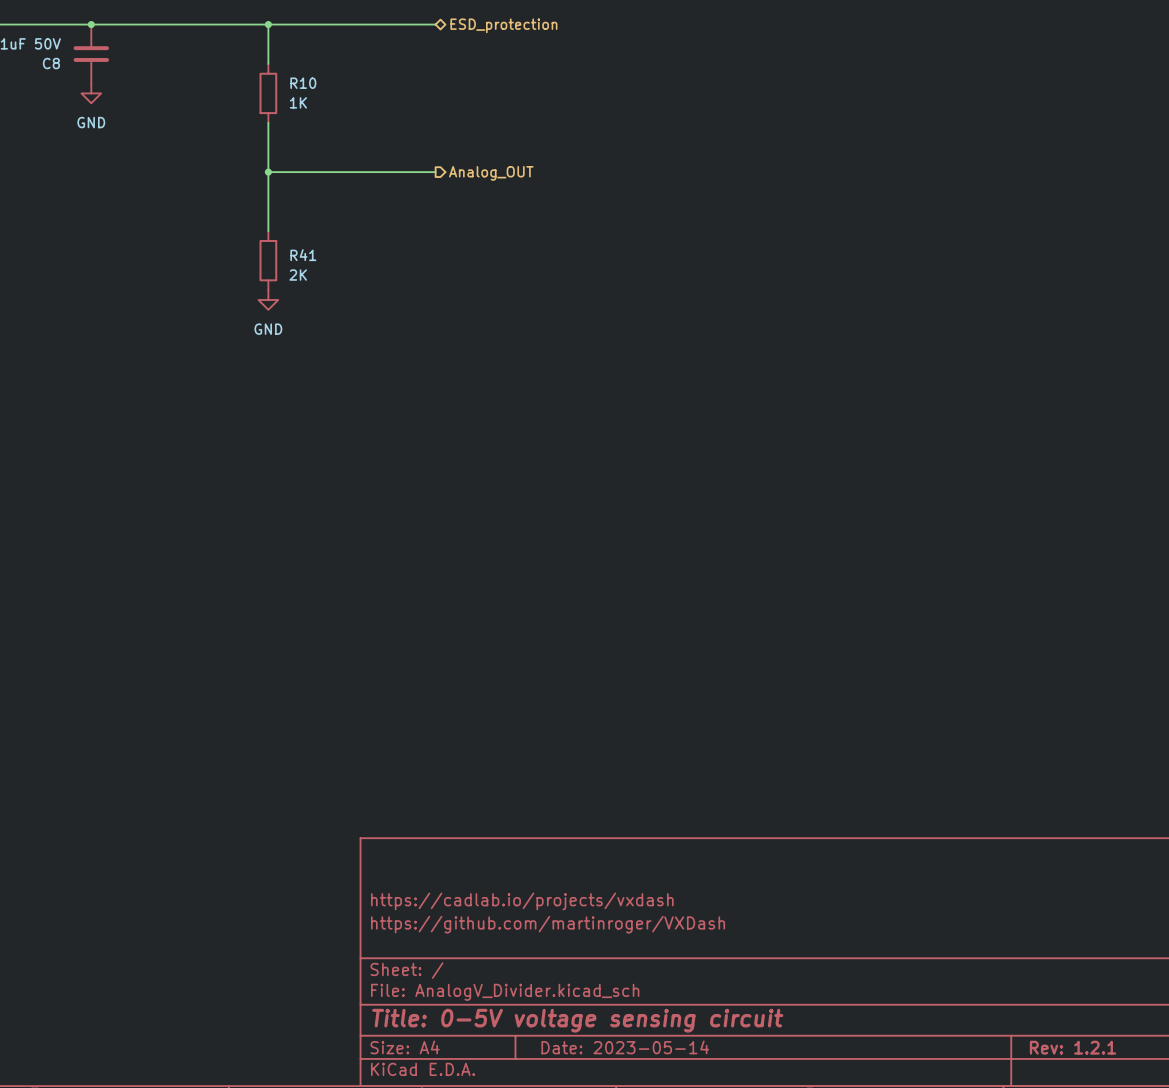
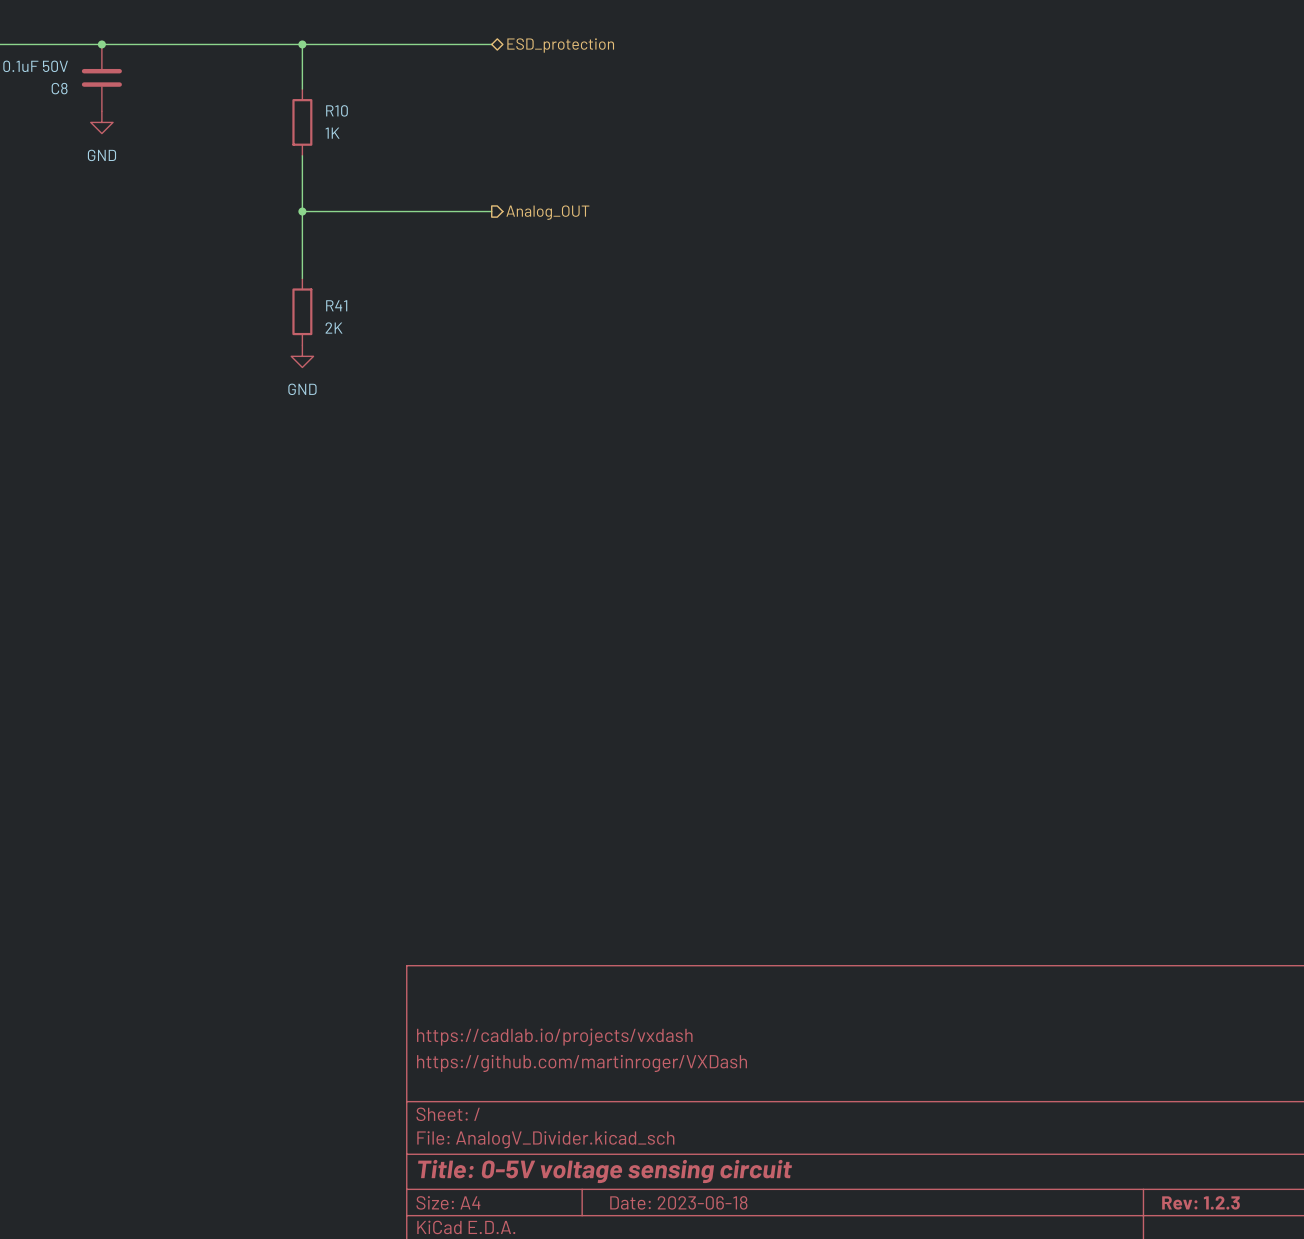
title block: Date: 2023-05-14 (625, 1047) -> Date: 2023-06-18 (678, 1202)
title block: Rev: 1.2.1 (1073, 1047) -> Rev: 1.2.3 (1201, 1202)

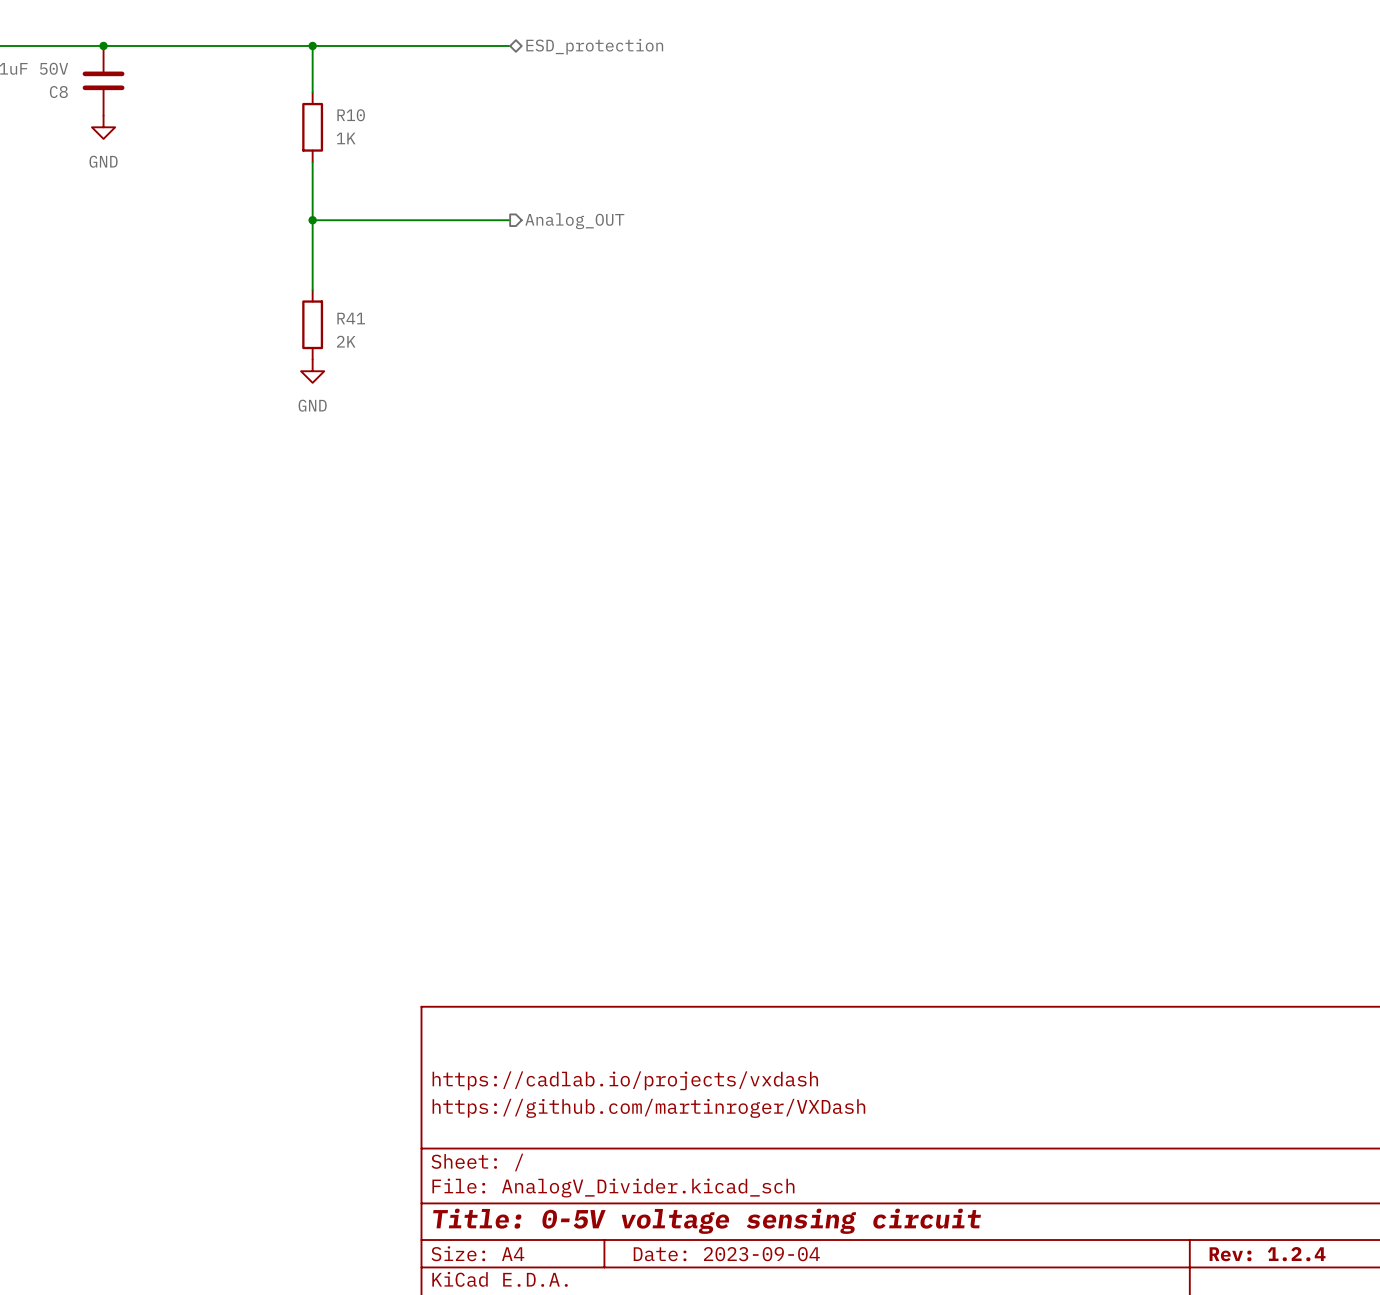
title block: Date: 2023-06-18 (678, 1202) -> Date: 2023-09-04 (726, 1254)
title block: Rev: 1.2.3 (1201, 1202) -> Rev: 1.2.4 (1267, 1254)

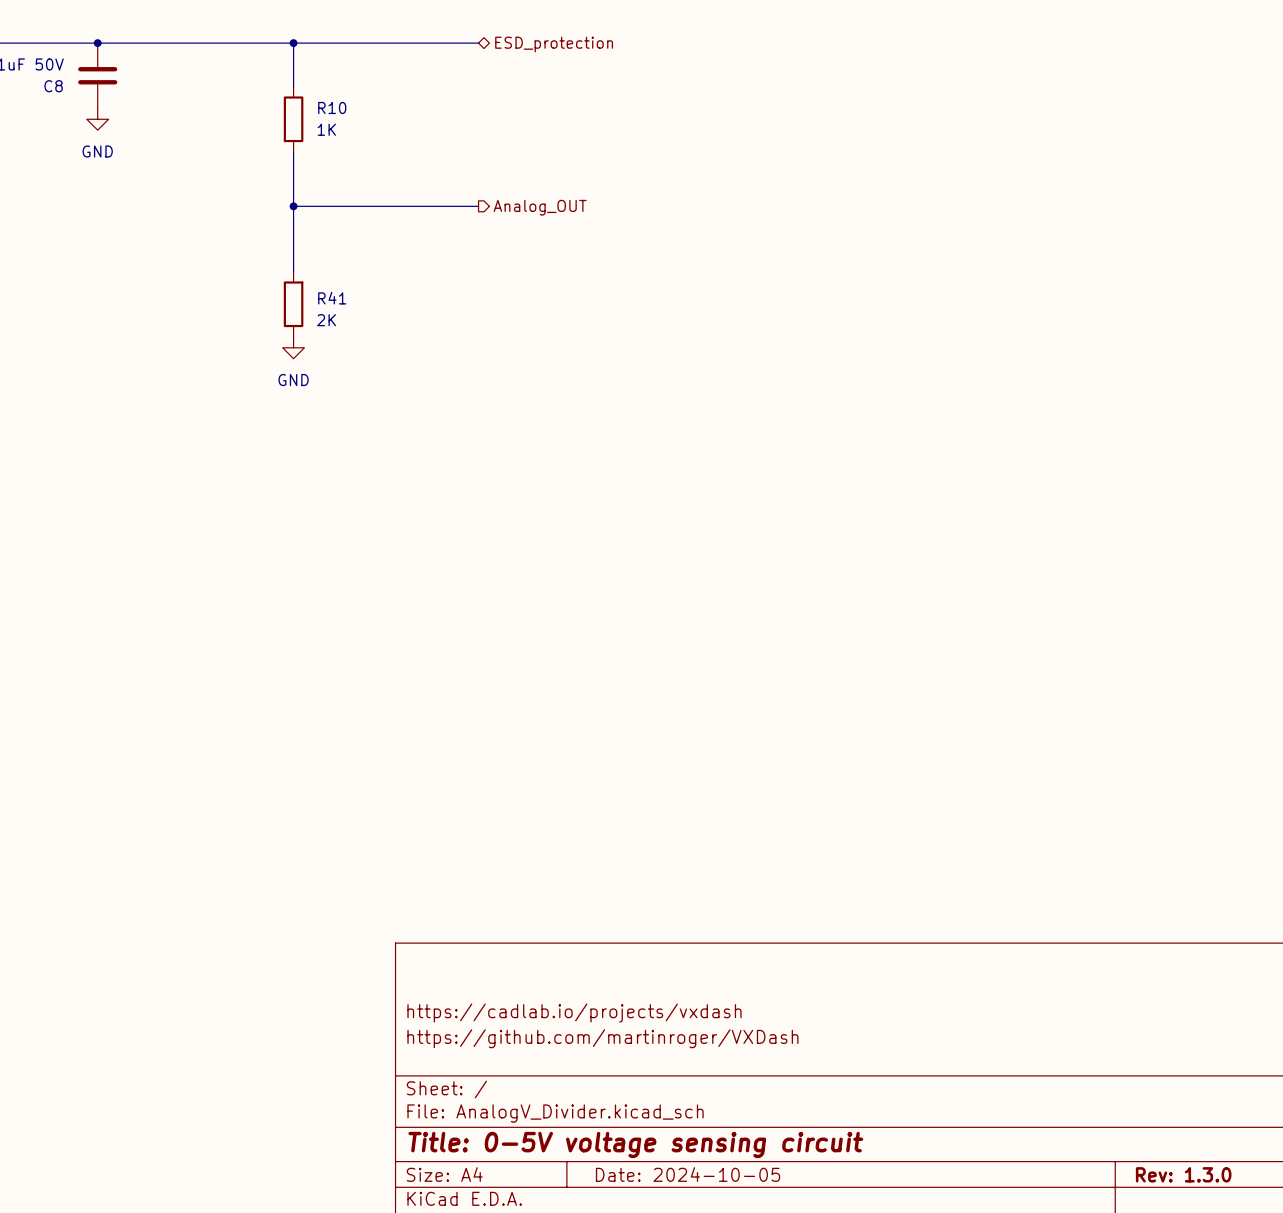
title block: Date: 2023-09-04 (726, 1254) -> Date: 2024-10-05 (688, 1174)
title block: Rev: 1.2.4 (1267, 1254) -> Rev: 1.3.0 (1183, 1174)

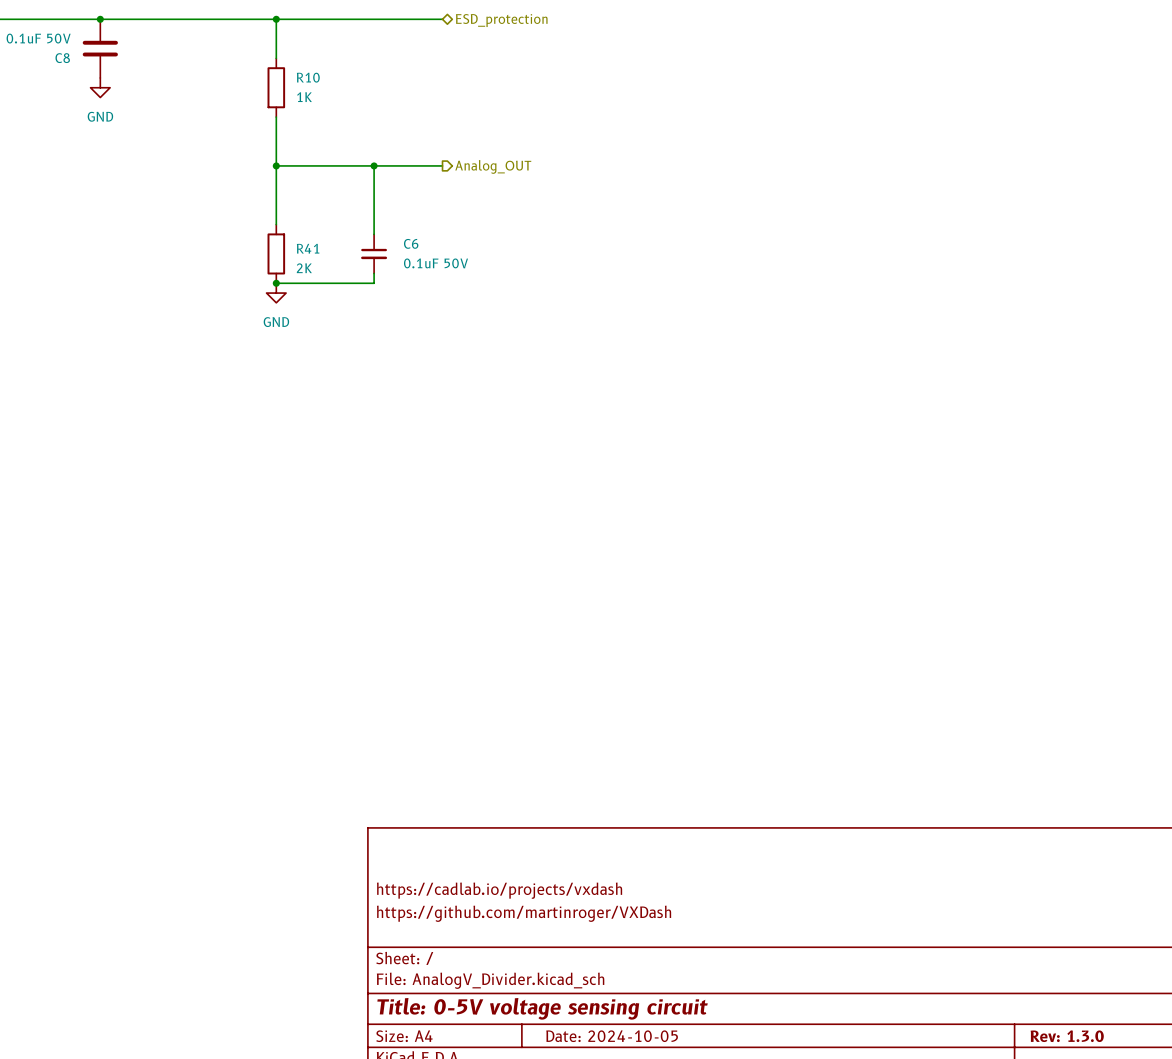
wire: none -> (374, 165) (374, 234)
junction: none -> (374, 165)
C6: none -> 0.1uF 50V (374, 253)
wire: none -> (374, 273) (374, 283) (276, 283)
junction: none -> (276, 283)

